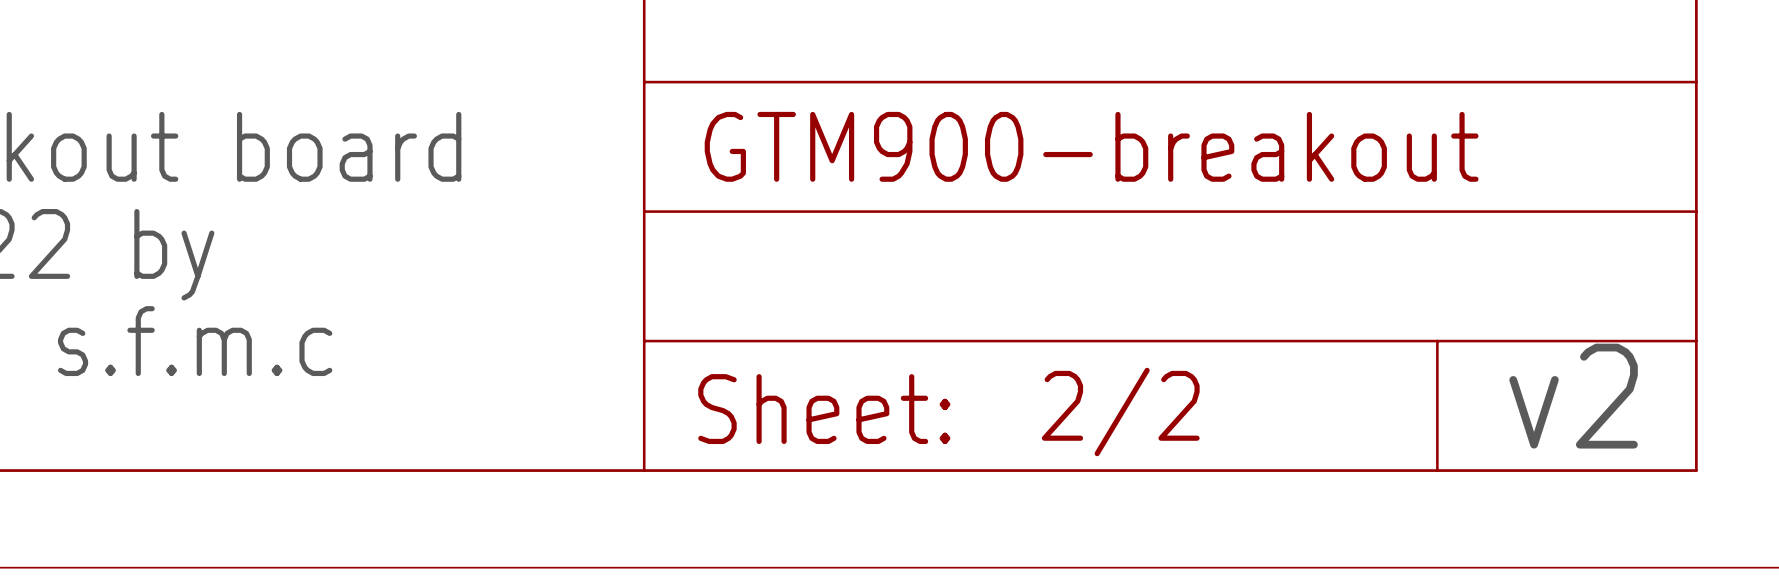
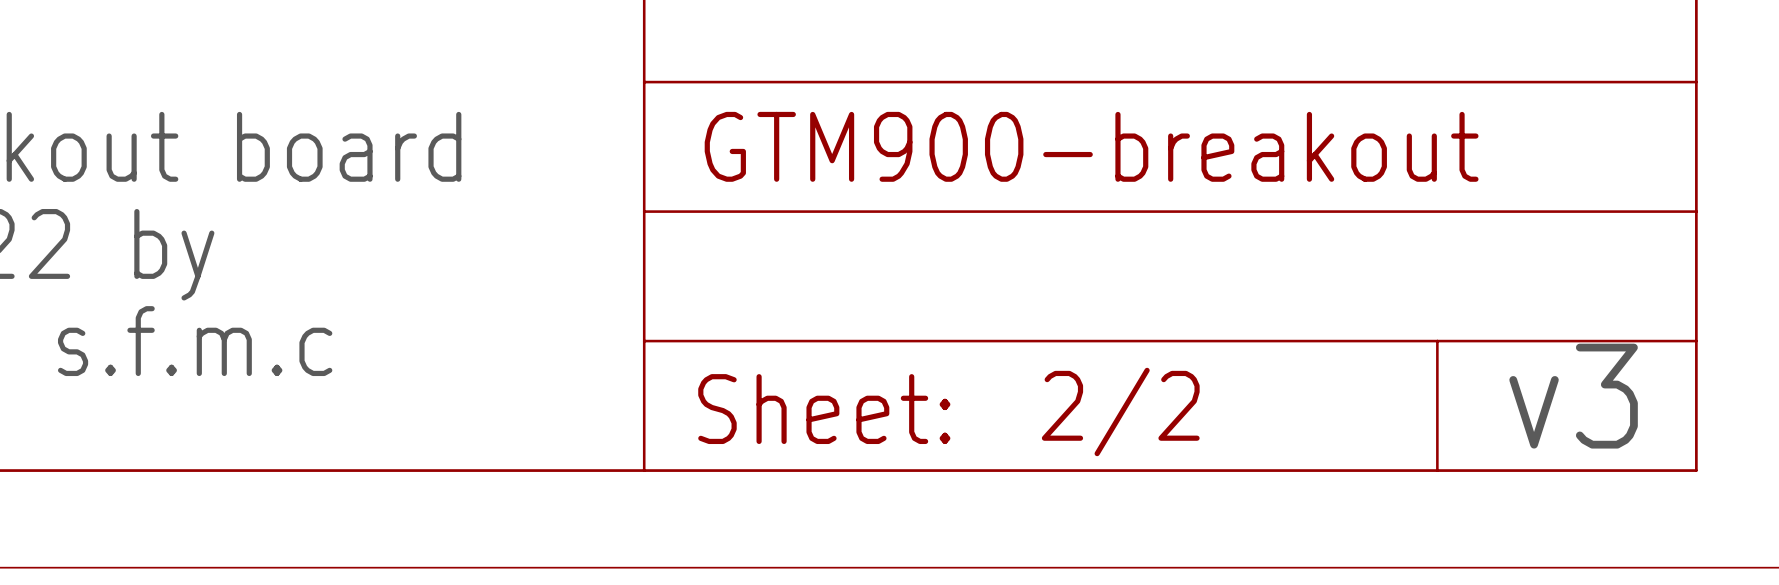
text: v2 (1573, 396) -> v3 (1573, 396)

